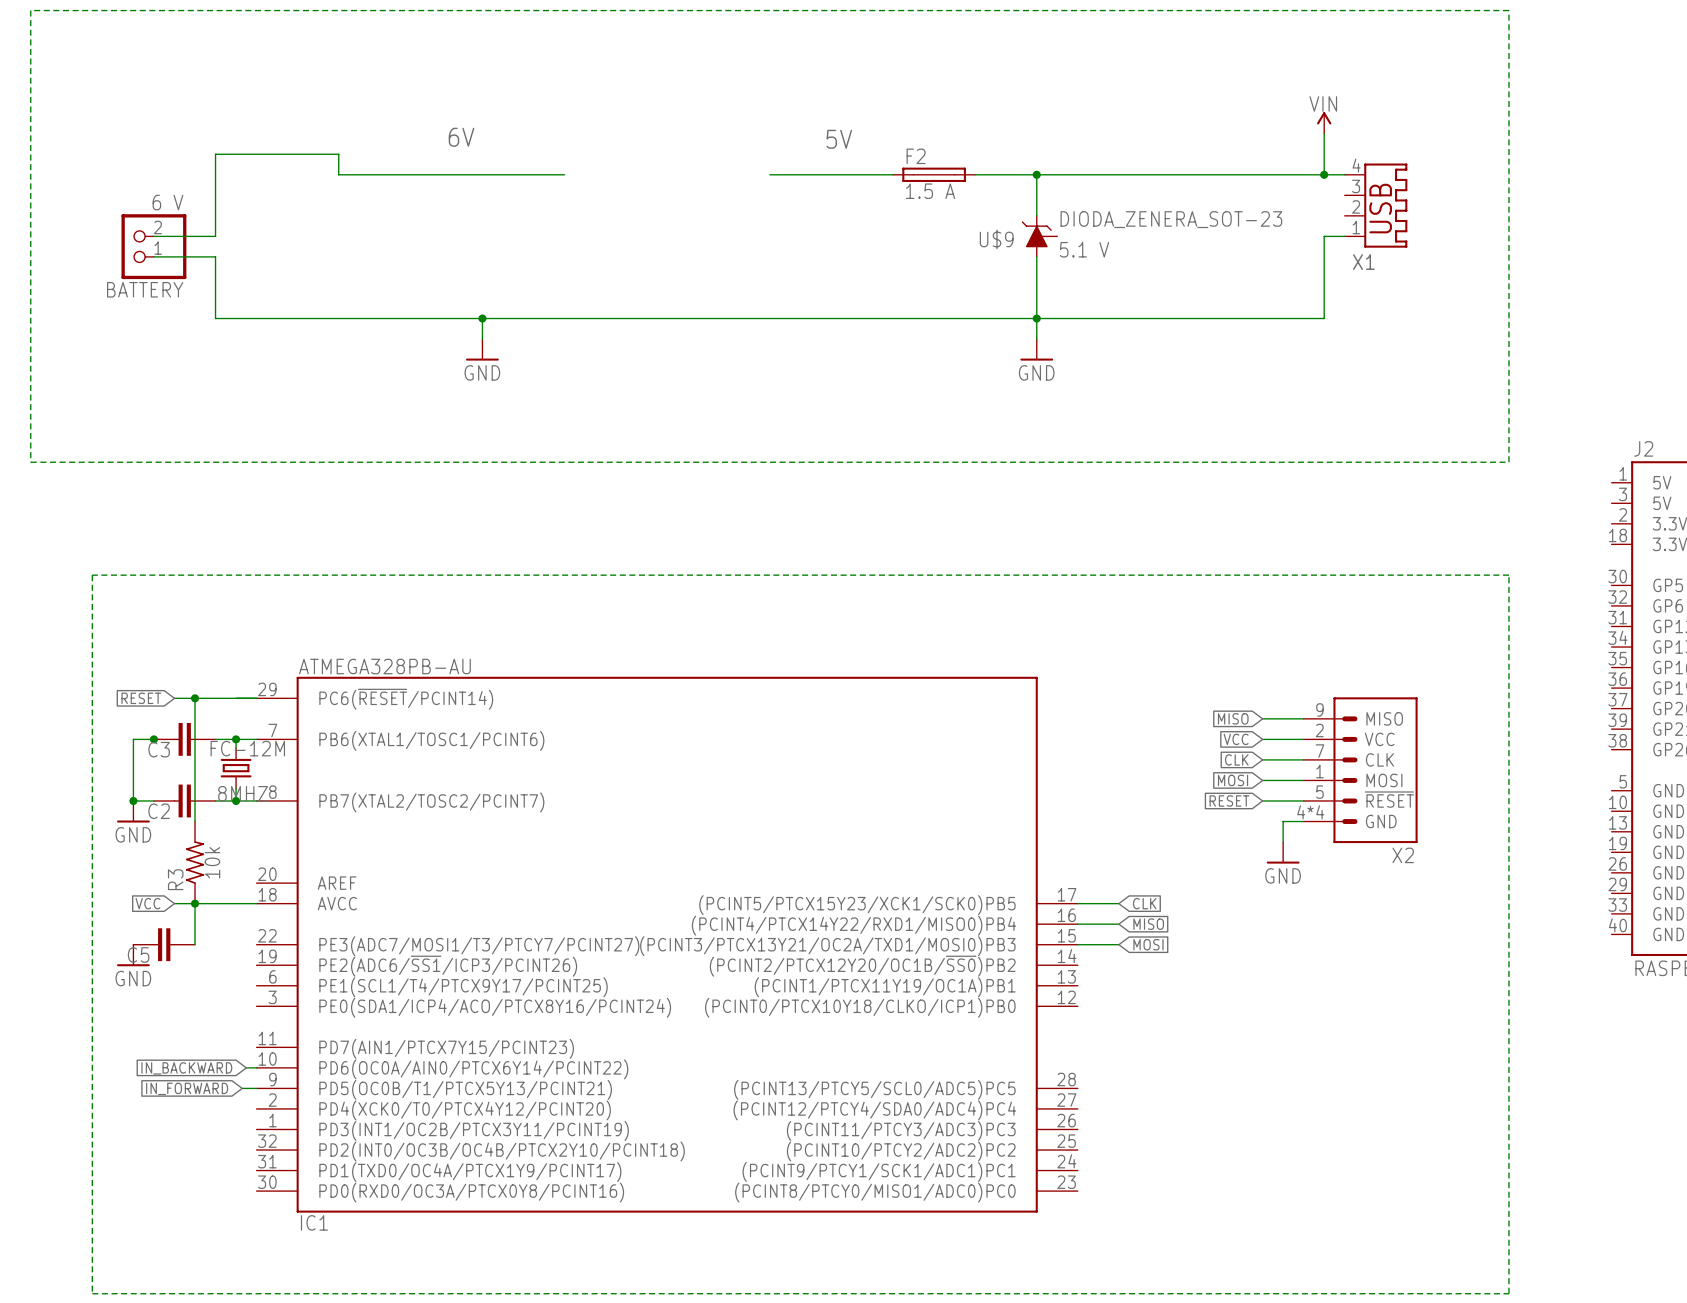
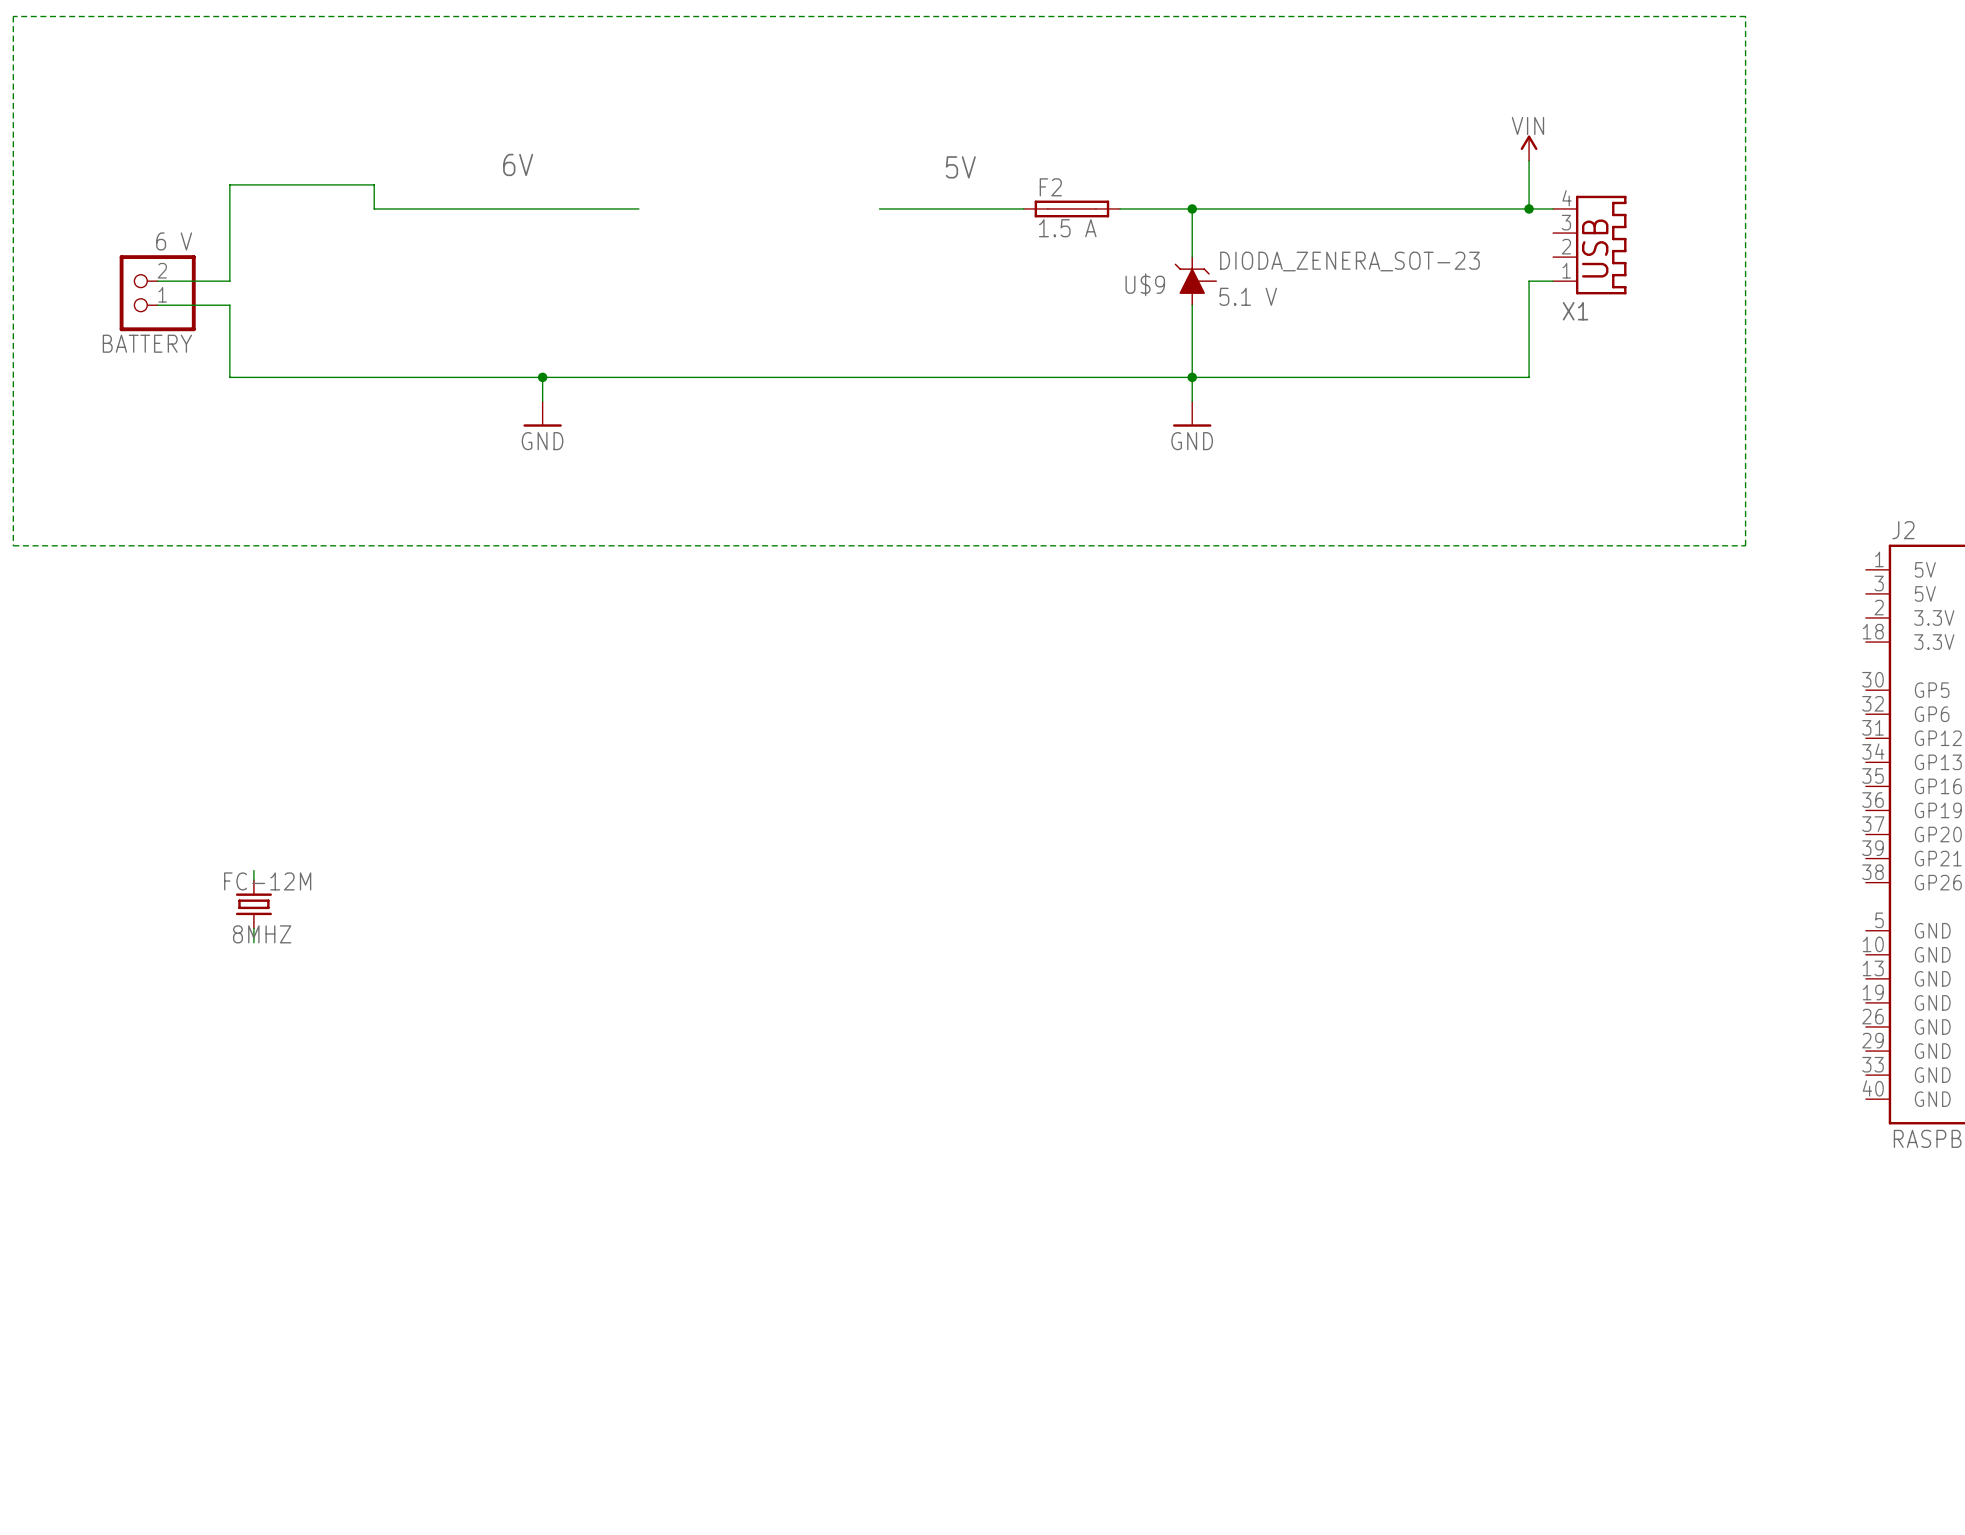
wire: (92, 575) (1508, 575) (1508, 1293) (92, 1293) (92, 575) -> none
global label: RESET (141, 698) -> none
wire: (174, 698) (256, 698) -> none
wire: (195, 698) (195, 821) -> none
junction: (195, 698) -> none
global label: MISO (1233, 718) -> none
wire: (1262, 718) (1303, 718) -> none
wire: (153, 739) (133, 739) (133, 800) -> none
junction: (153, 739) -> none
C3: (184, 739) -> none
wire: (215, 739) (256, 739) -> none
junction: (236, 739) -> none
global label: VCC (1236, 739) -> none
wire: (1262, 739) (1303, 739) -> none
global label: CLK (1236, 759) -> none
wire: (1262, 759) (1303, 759) -> none
X2: (1360, 770) -> none
global label: MOSI (1233, 780) -> none
wire: (1262, 780) (1303, 780) -> none
wire: (131, 800) (153, 800) -> none
junction: (133, 800) -> none
C2: (184, 800) -> none
wire: (215, 800) (256, 800) -> none
junction: (236, 800) -> none
global label: RESET (1229, 800) -> none
wire: (1262, 800) (1303, 800) -> none
power symbol: GND (133, 811) -> none
wire: (1303, 821) (1283, 821) (1283, 842) -> none
power symbol: GND (1283, 852) -> none
R3: 10k (195, 862) -> none
global label: VCC (147, 903) -> none
wire: (174, 903) (256, 903) -> none
wire: (195, 903) (195, 944) -> none
junction: (195, 903) -> none
wire: (1077, 903) (1118, 903) -> none
global label: CLK (1144, 903) -> none
wire: (1077, 924) (1118, 924) -> none
global label: MISO (1148, 924) -> none
C5: (164, 944) -> none
IC1: ATMEGA328PB-AU (667, 944) -> none
wire: (1077, 944) (1118, 944) -> none
global label: MOSI (1148, 944) -> none
power symbol: GND (133, 955) -> none
wire: (246, 1067) (256, 1067) -> none
global label: IN_BACKWARD (186, 1068) -> none
global label: IN_FORWARD (187, 1088) -> none
wire: (242, 1088) (256, 1088) -> none

